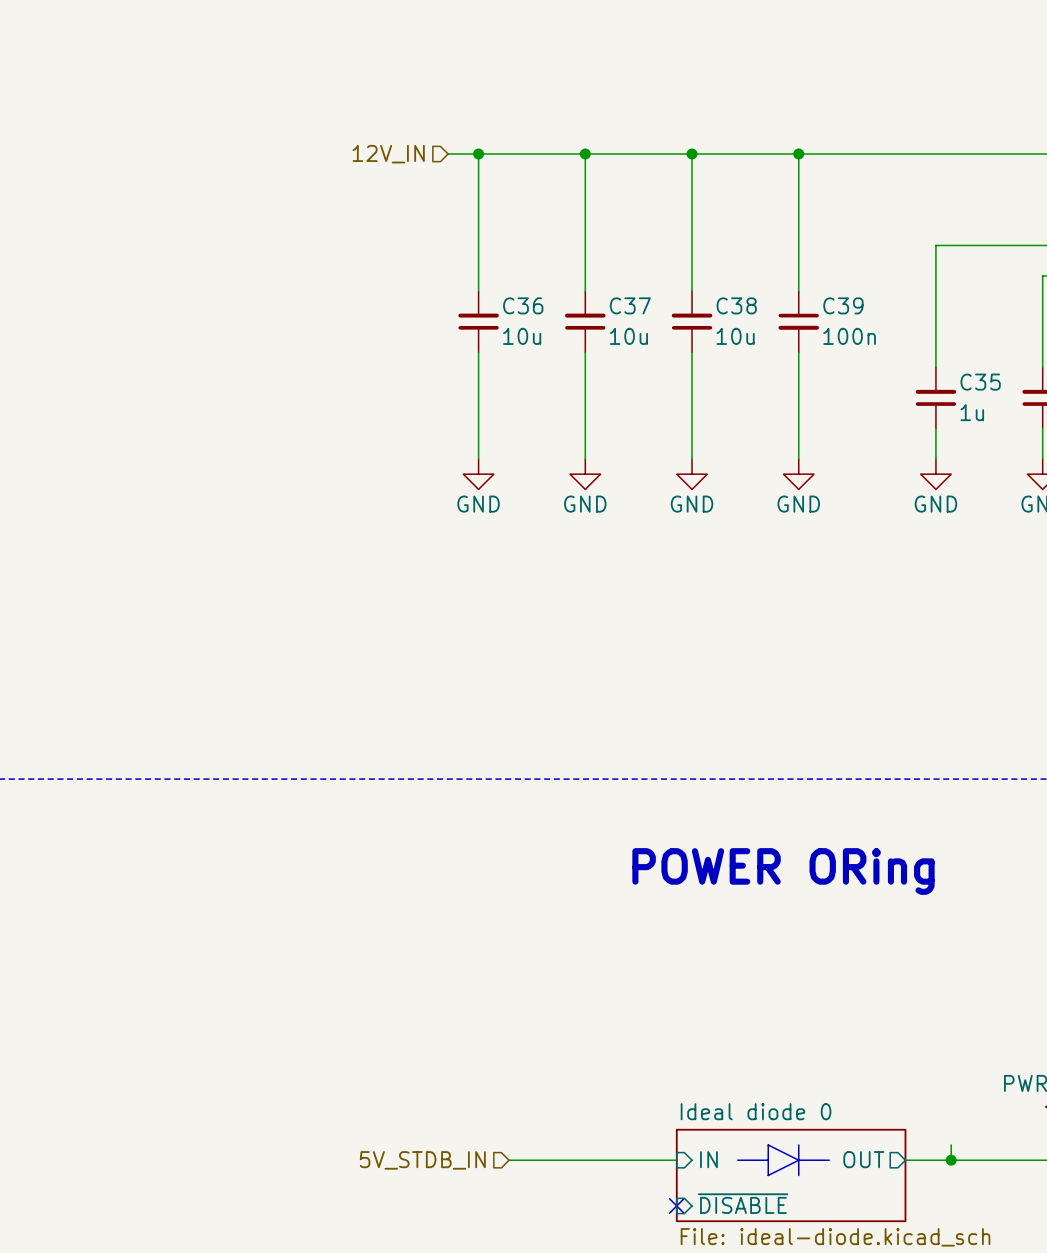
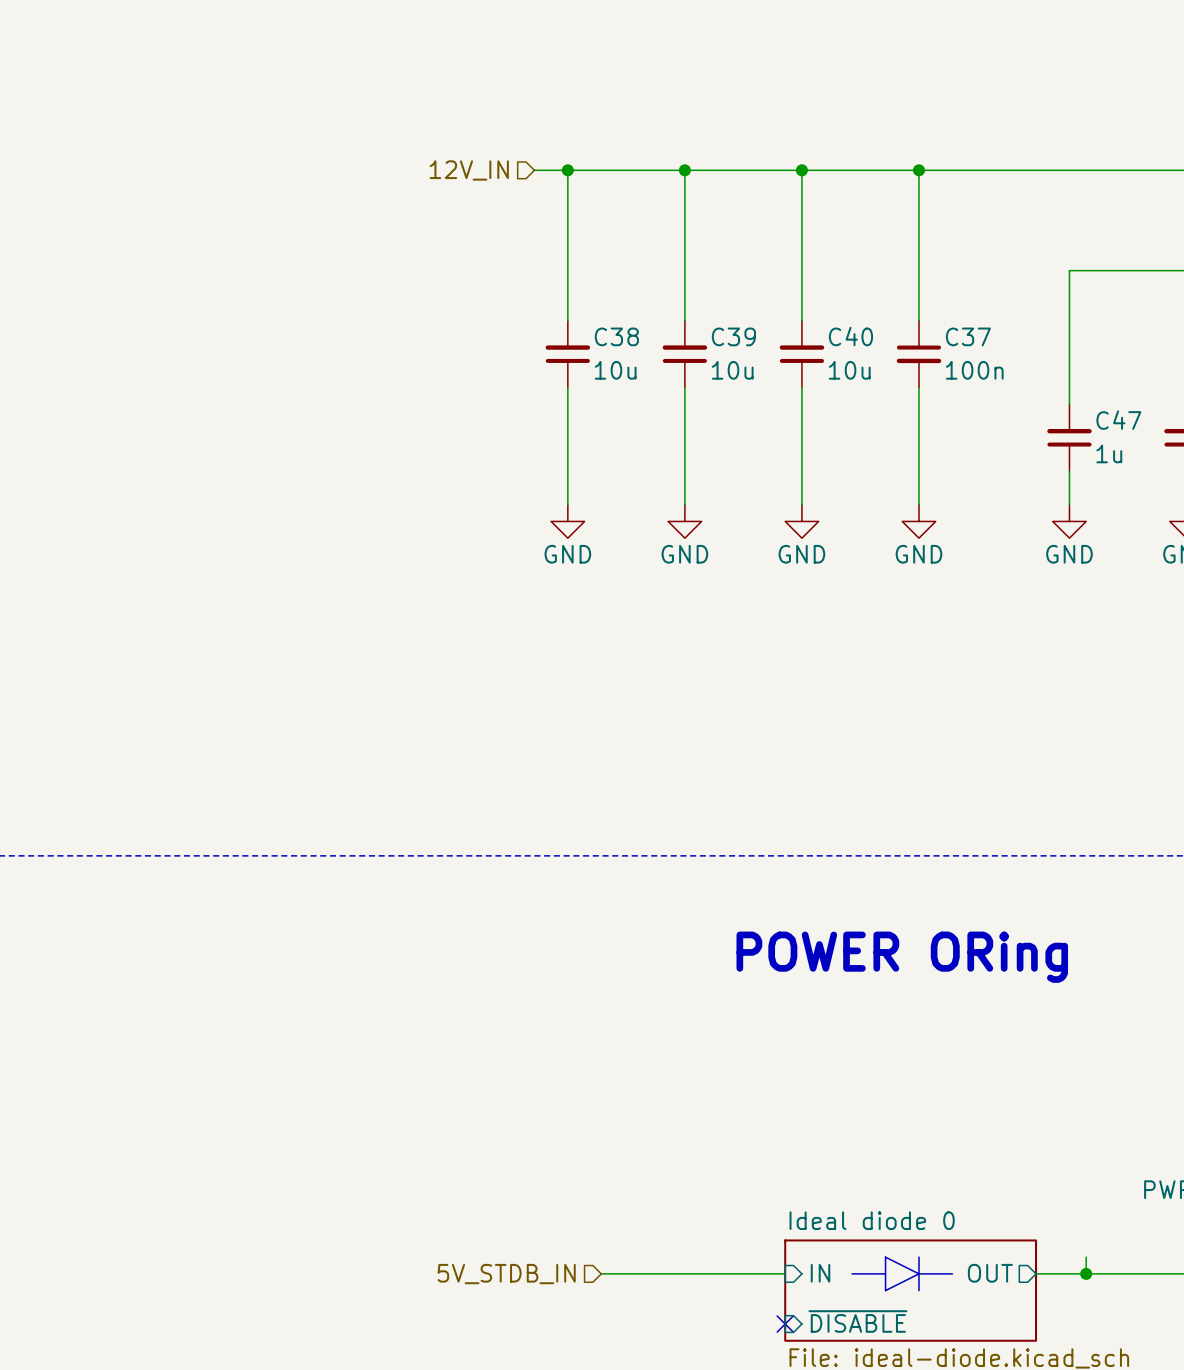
C36 name: C36 (523, 305) -> C38 (616, 336)
C37 name: C37 (630, 305) -> C39 (733, 336)
C38 name: C38 (736, 305) -> C40 (850, 336)
C39 name: C39 (843, 305) -> C37 (968, 336)
C35 name: C35 (980, 382) -> C47 (1118, 420)

